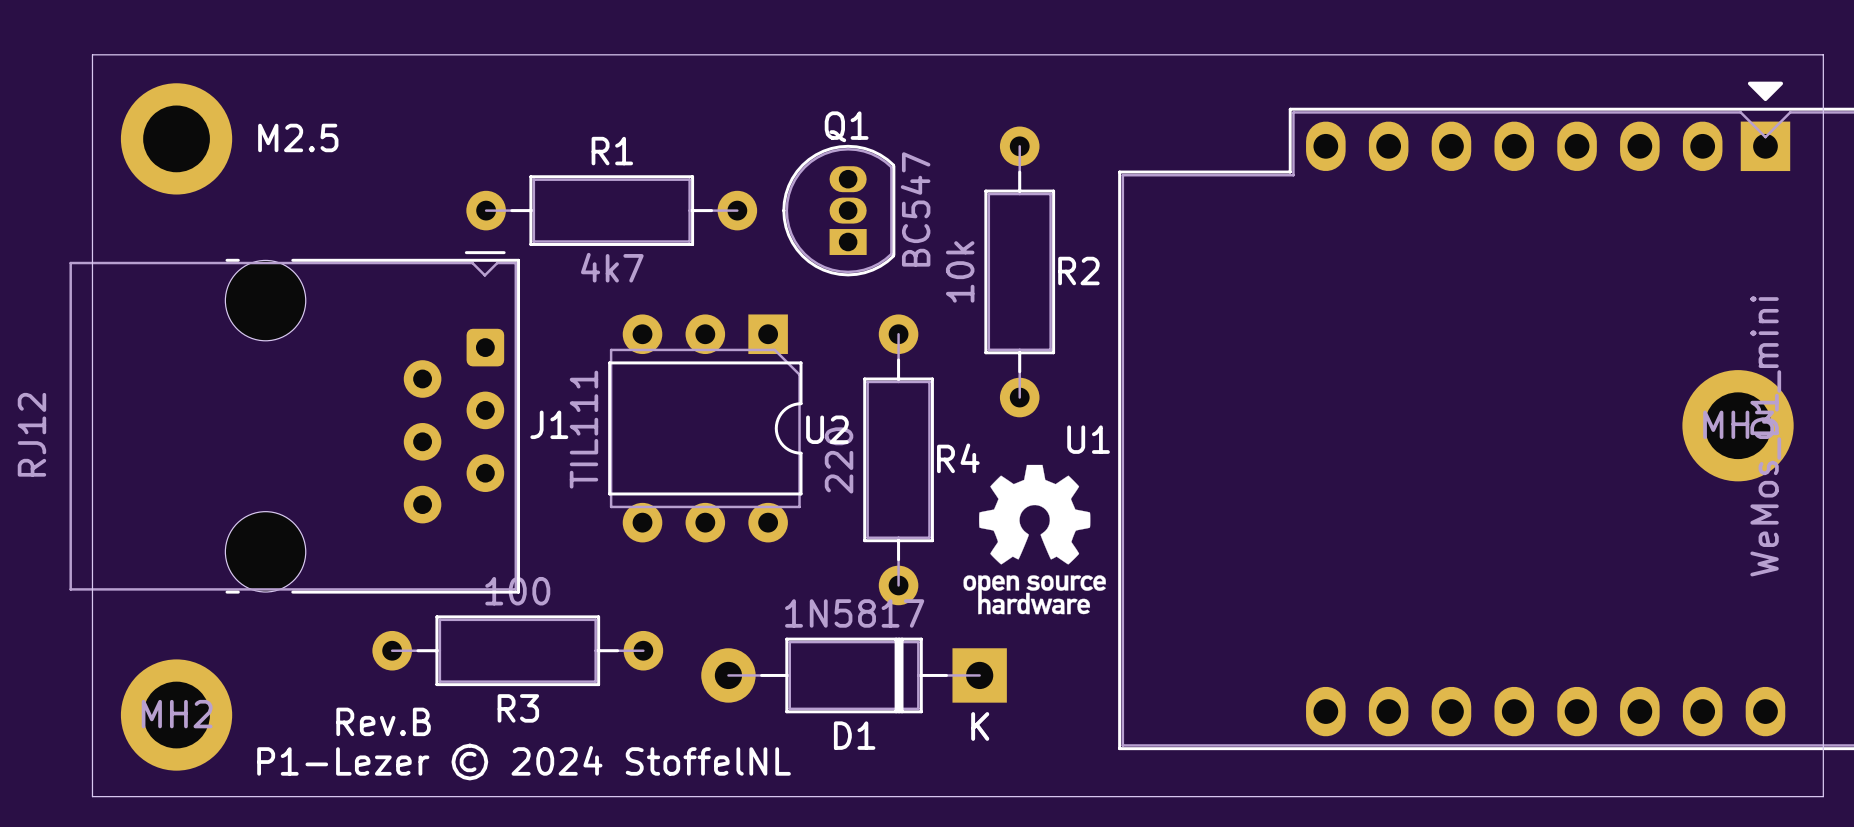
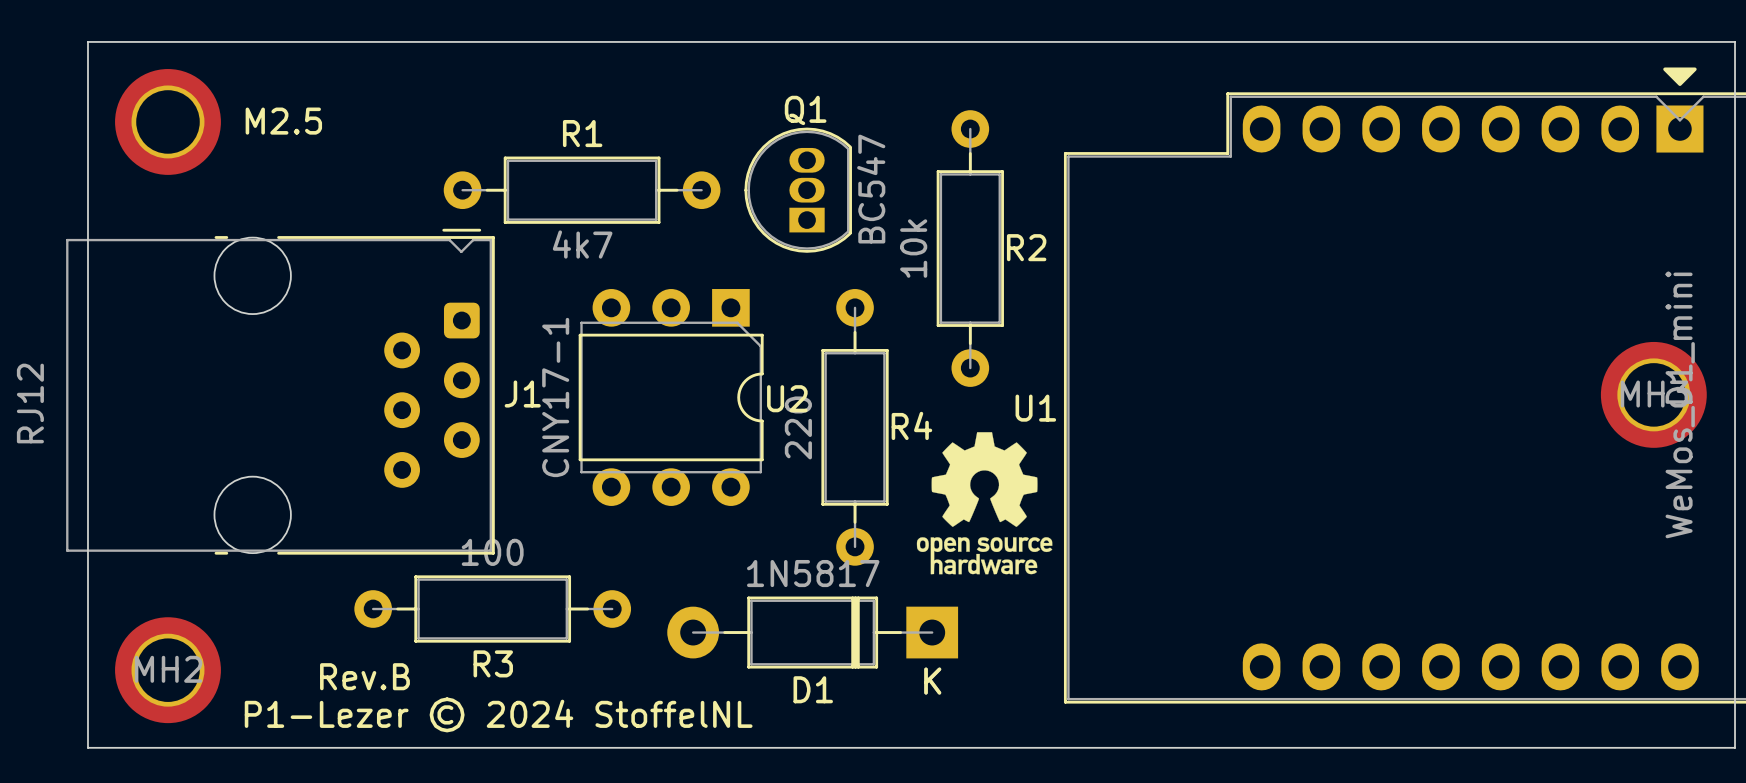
U2 value: TIL111 (583, 429) -> CNY17-1 (555, 397)

